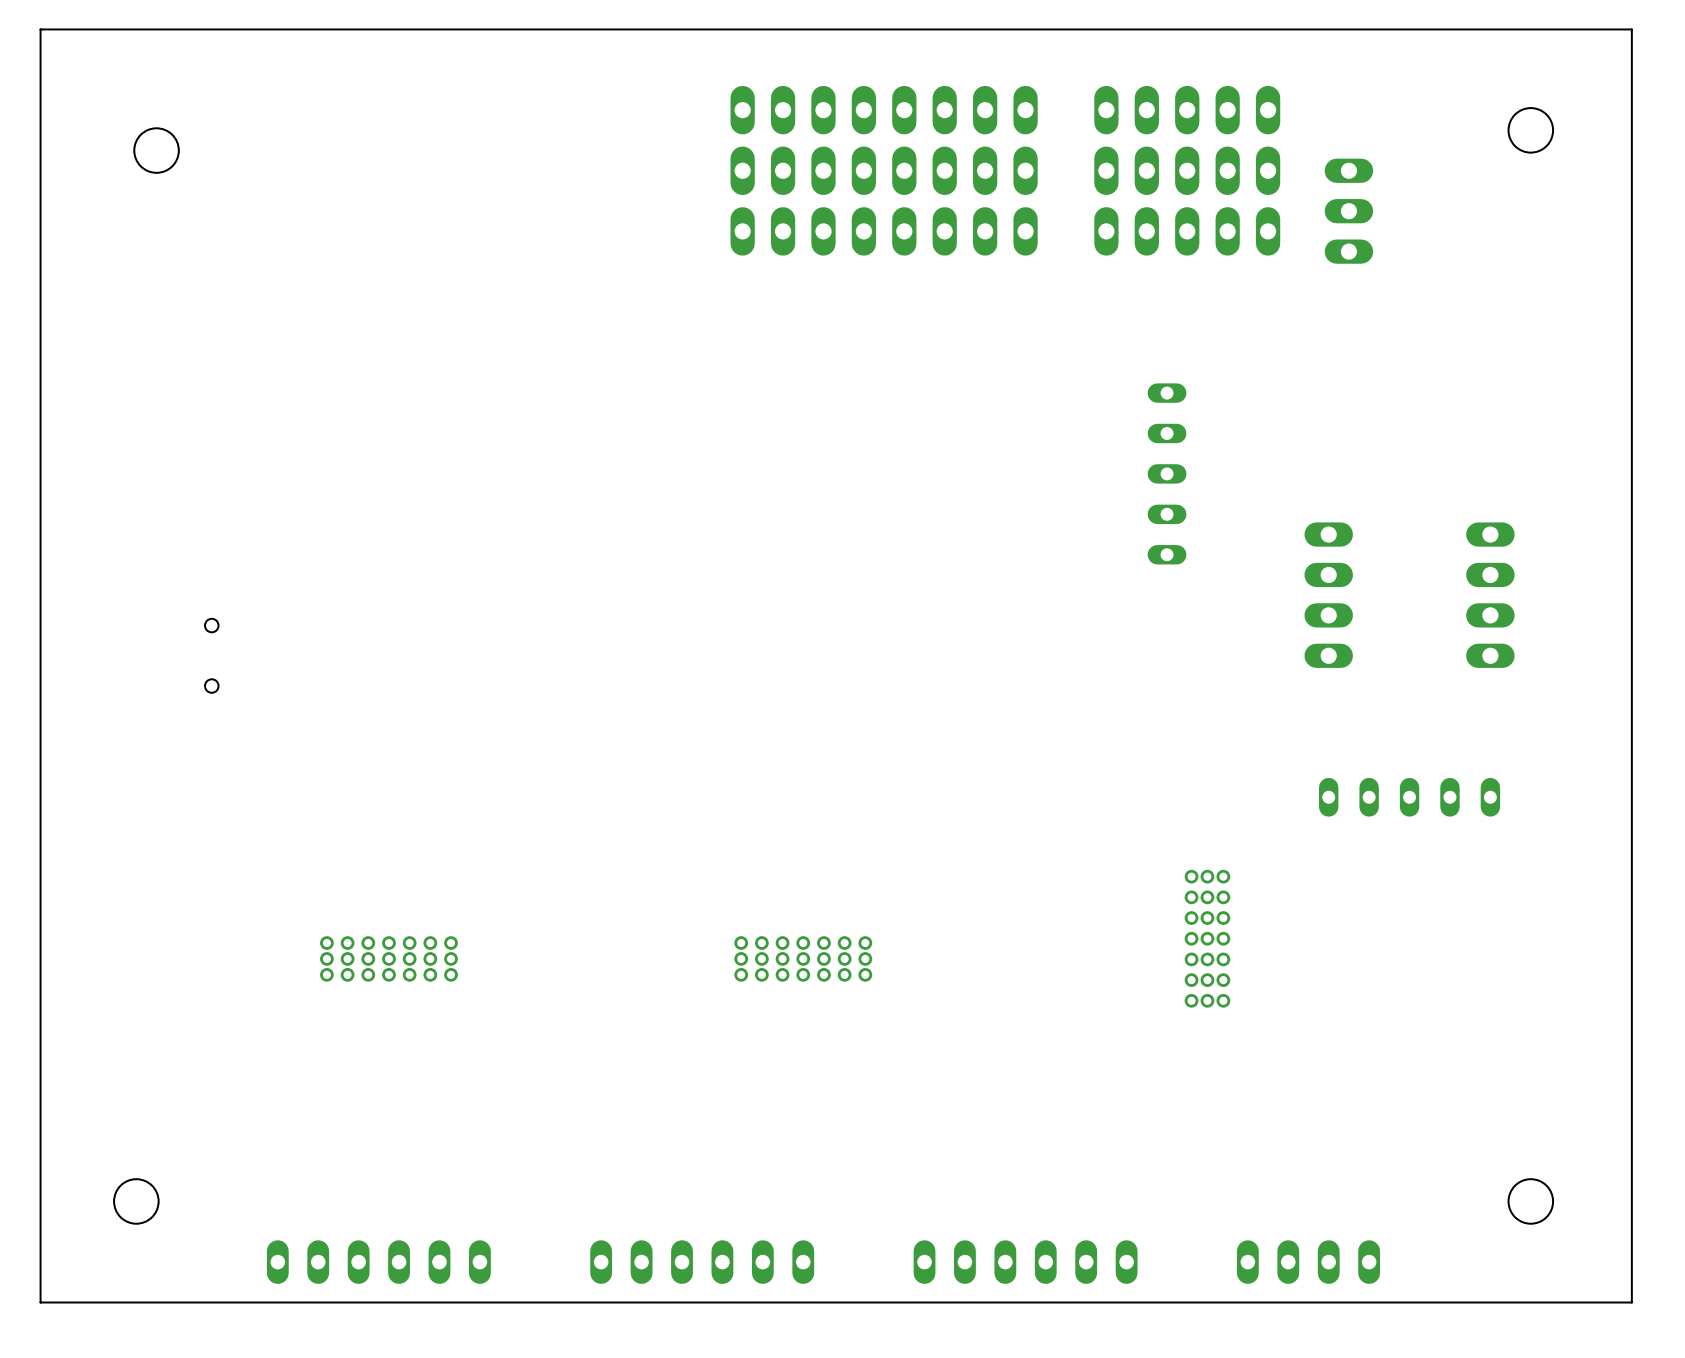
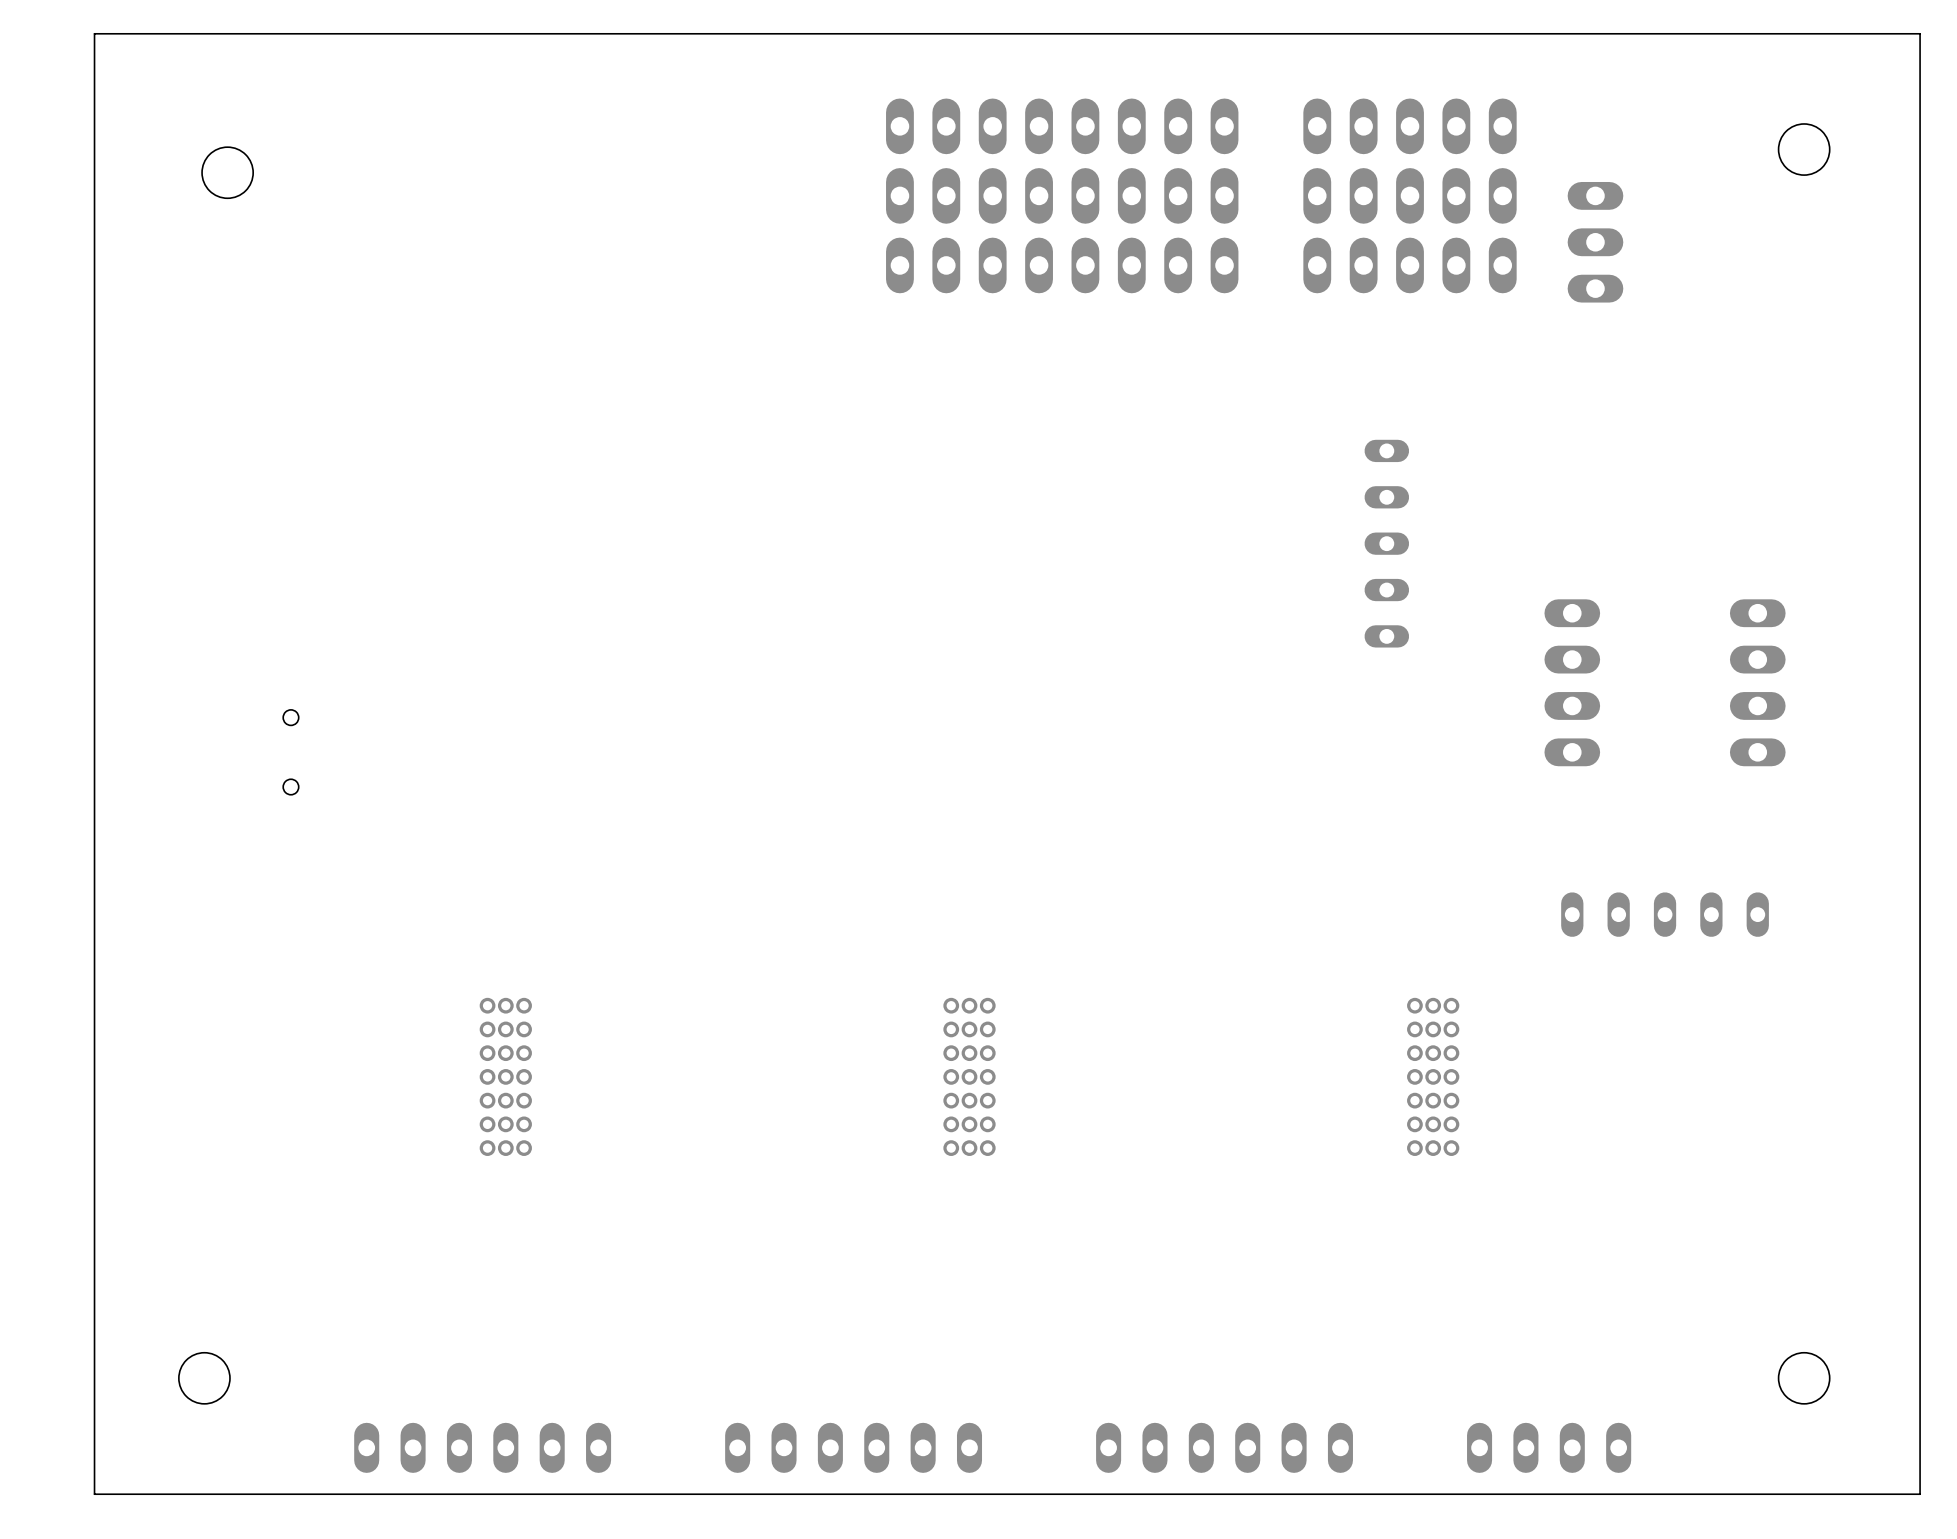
part rotation: 0° (388, 958) -> 90° clockwise (505, 1076)
part rotation: 0° (803, 958) -> 90° clockwise (969, 1076)

